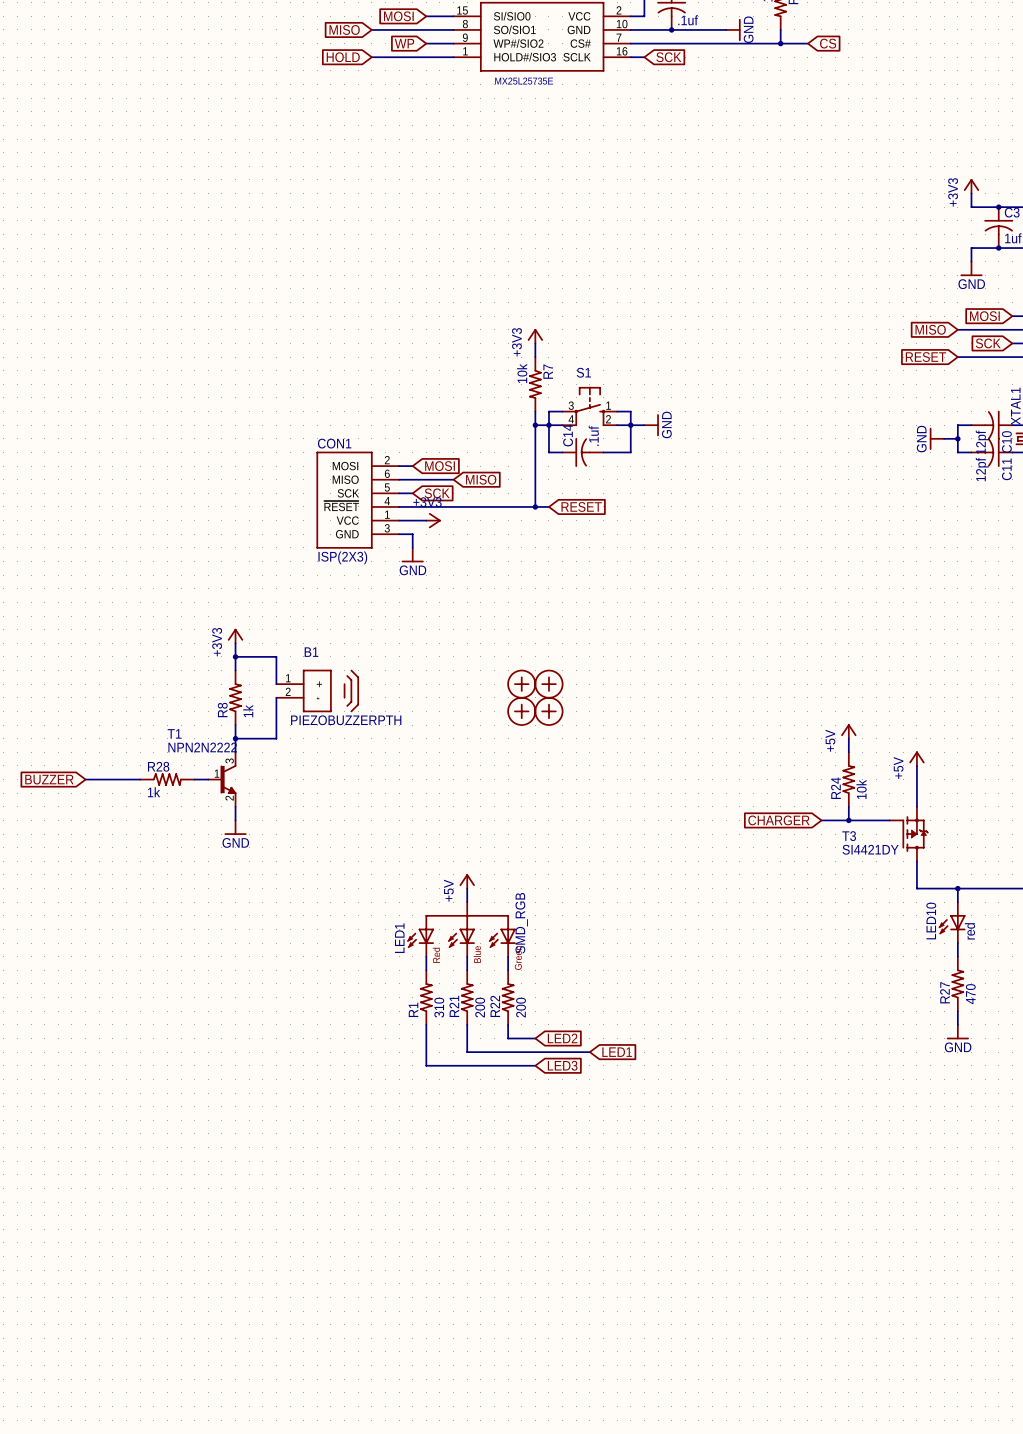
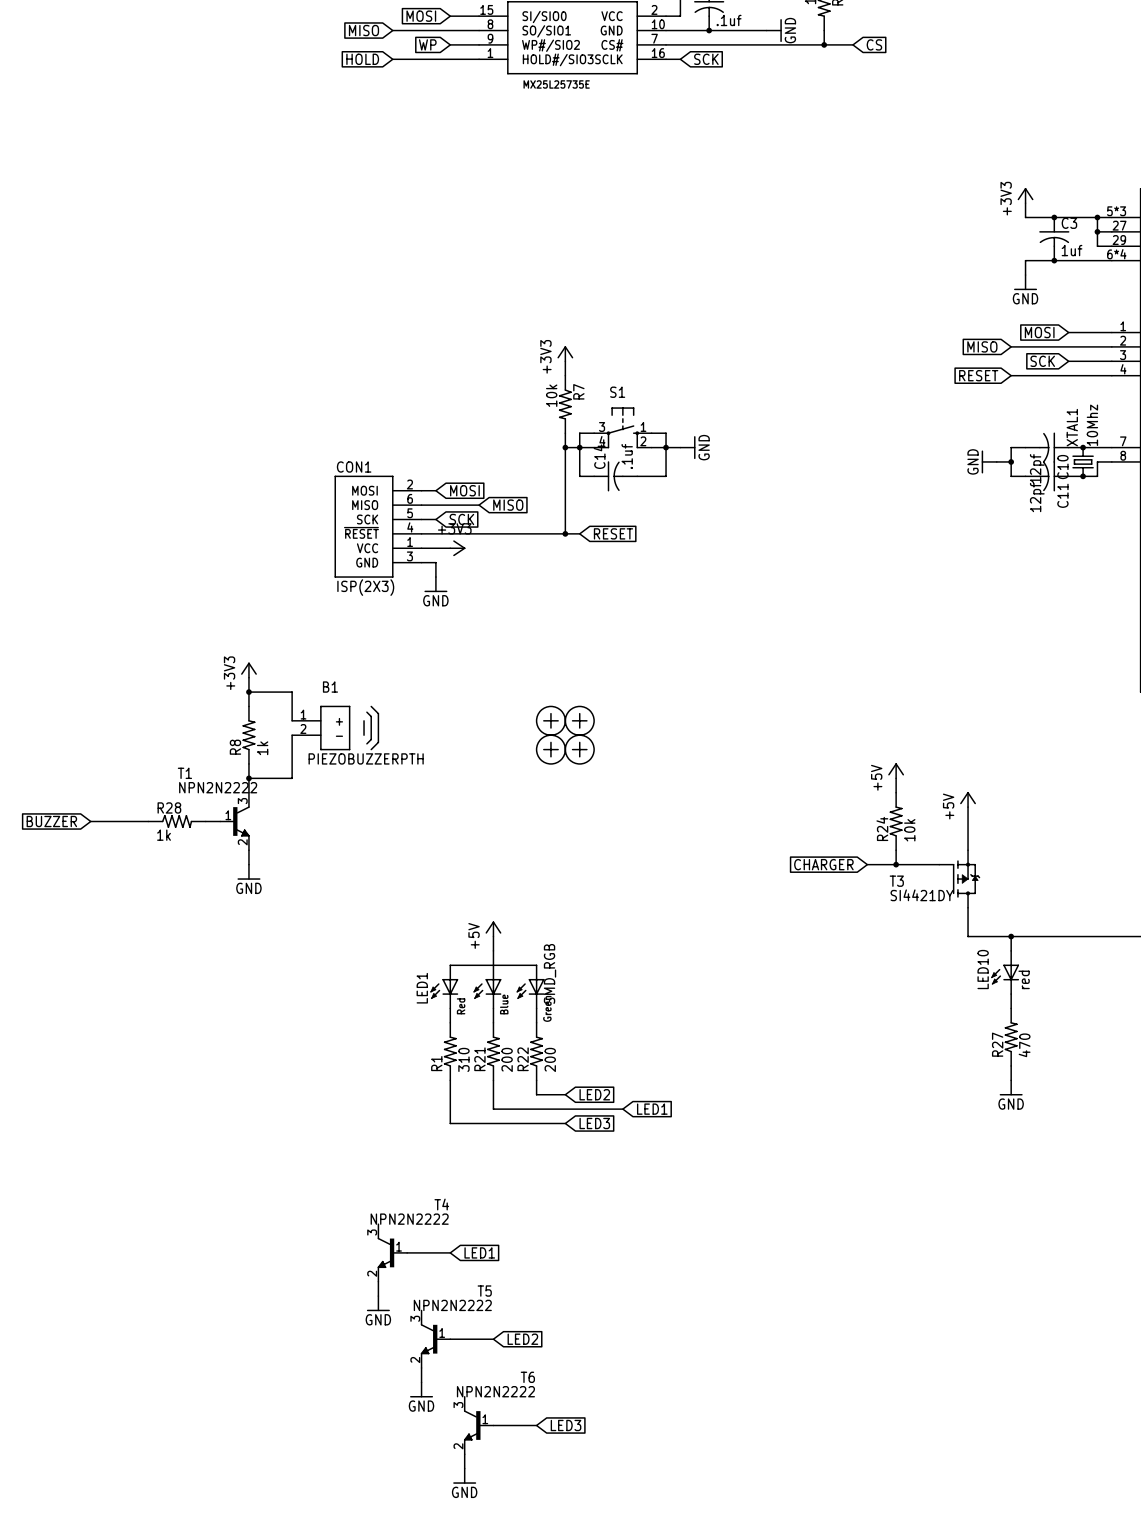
T4: none -> NPN2N2222 (392, 1252)
wire: none -> (407, 1252) (450, 1252)
global label: none -> LED1 (479, 1252)
wire: none -> (378, 1281) (378, 1296)
power symbol: none -> GND (378, 1303)
T5: none -> NPN2N2222 (435, 1339)
wire: none -> (450, 1339) (493, 1339)
global label: none -> LED2 (522, 1339)
wire: none -> (421, 1367) (421, 1382)
power symbol: none -> GND (421, 1389)
T6: none -> NPN2N2222 (478, 1425)
wire: none -> (493, 1425) (536, 1425)
global label: none -> LED3 (566, 1425)
wire: none -> (464, 1454) (464, 1468)
power symbol: none -> GND (464, 1476)

